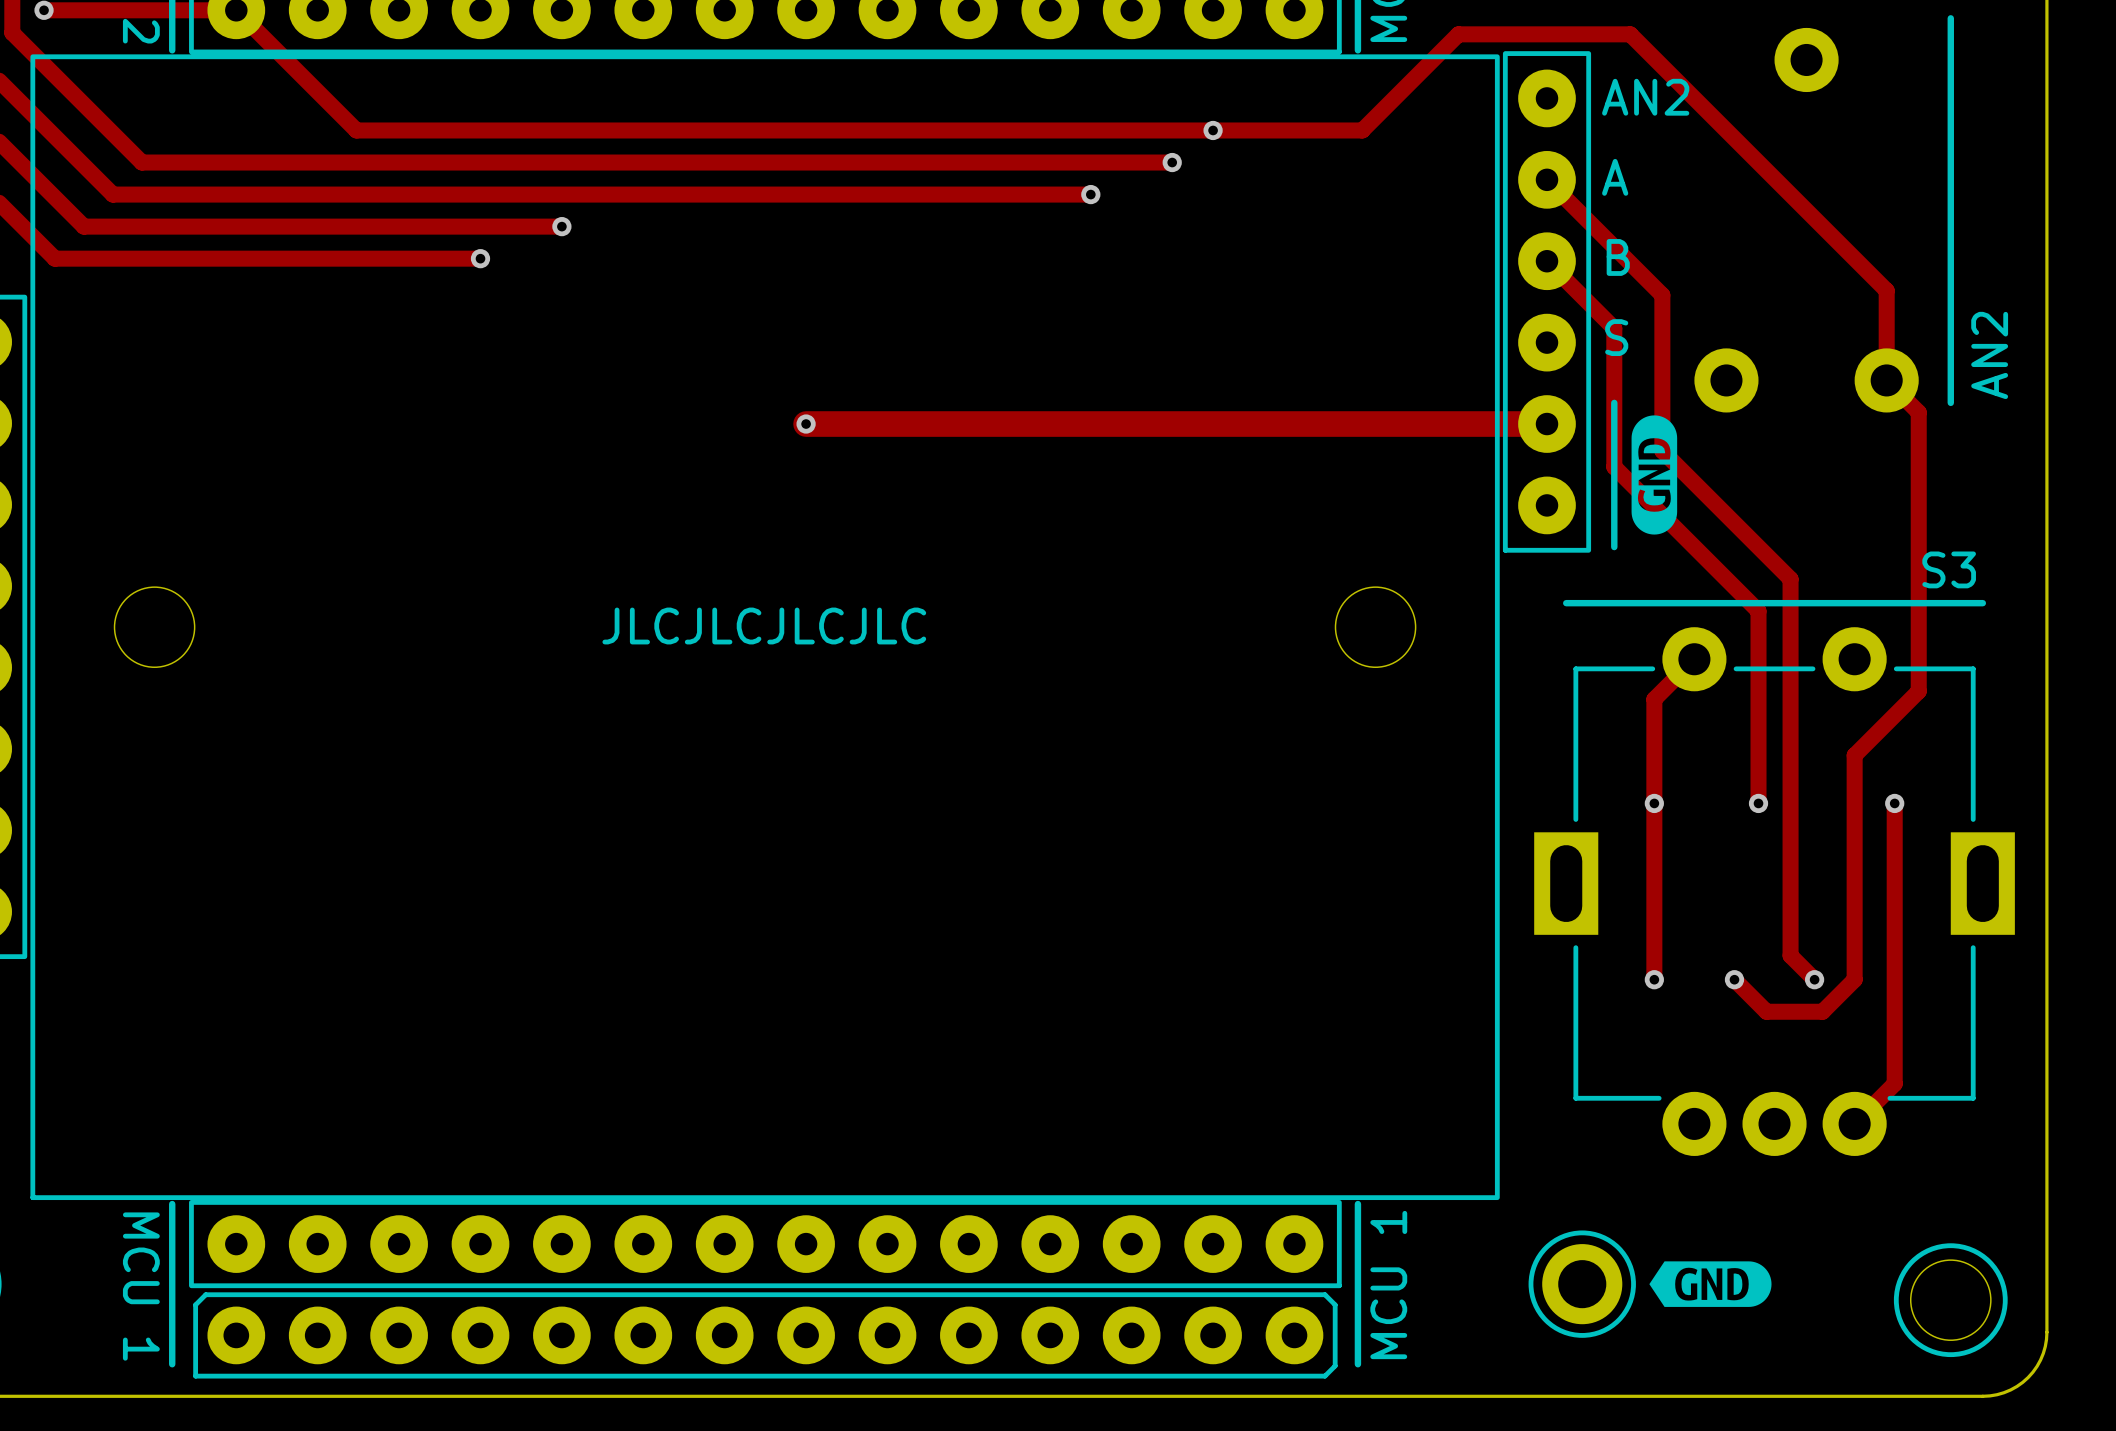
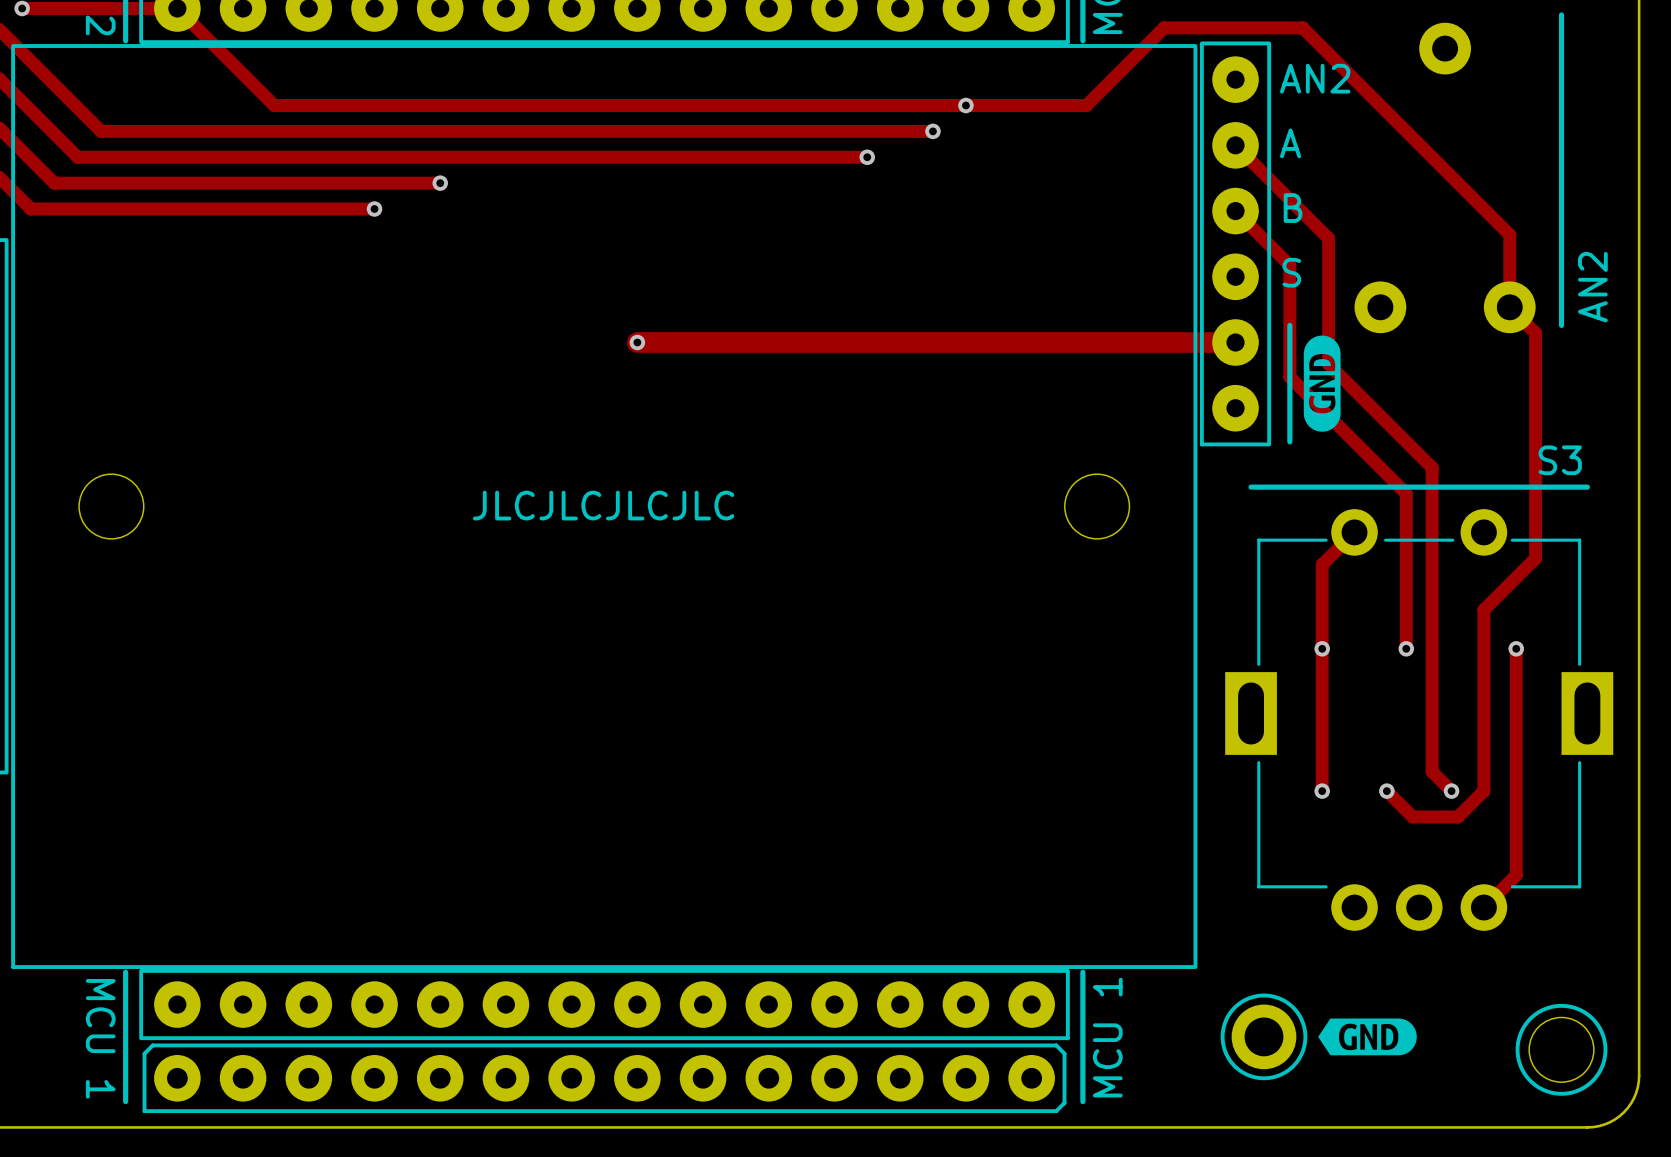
part footprint: [1534, 627, 2015, 1156] -> [1225, 509, 1614, 931]

